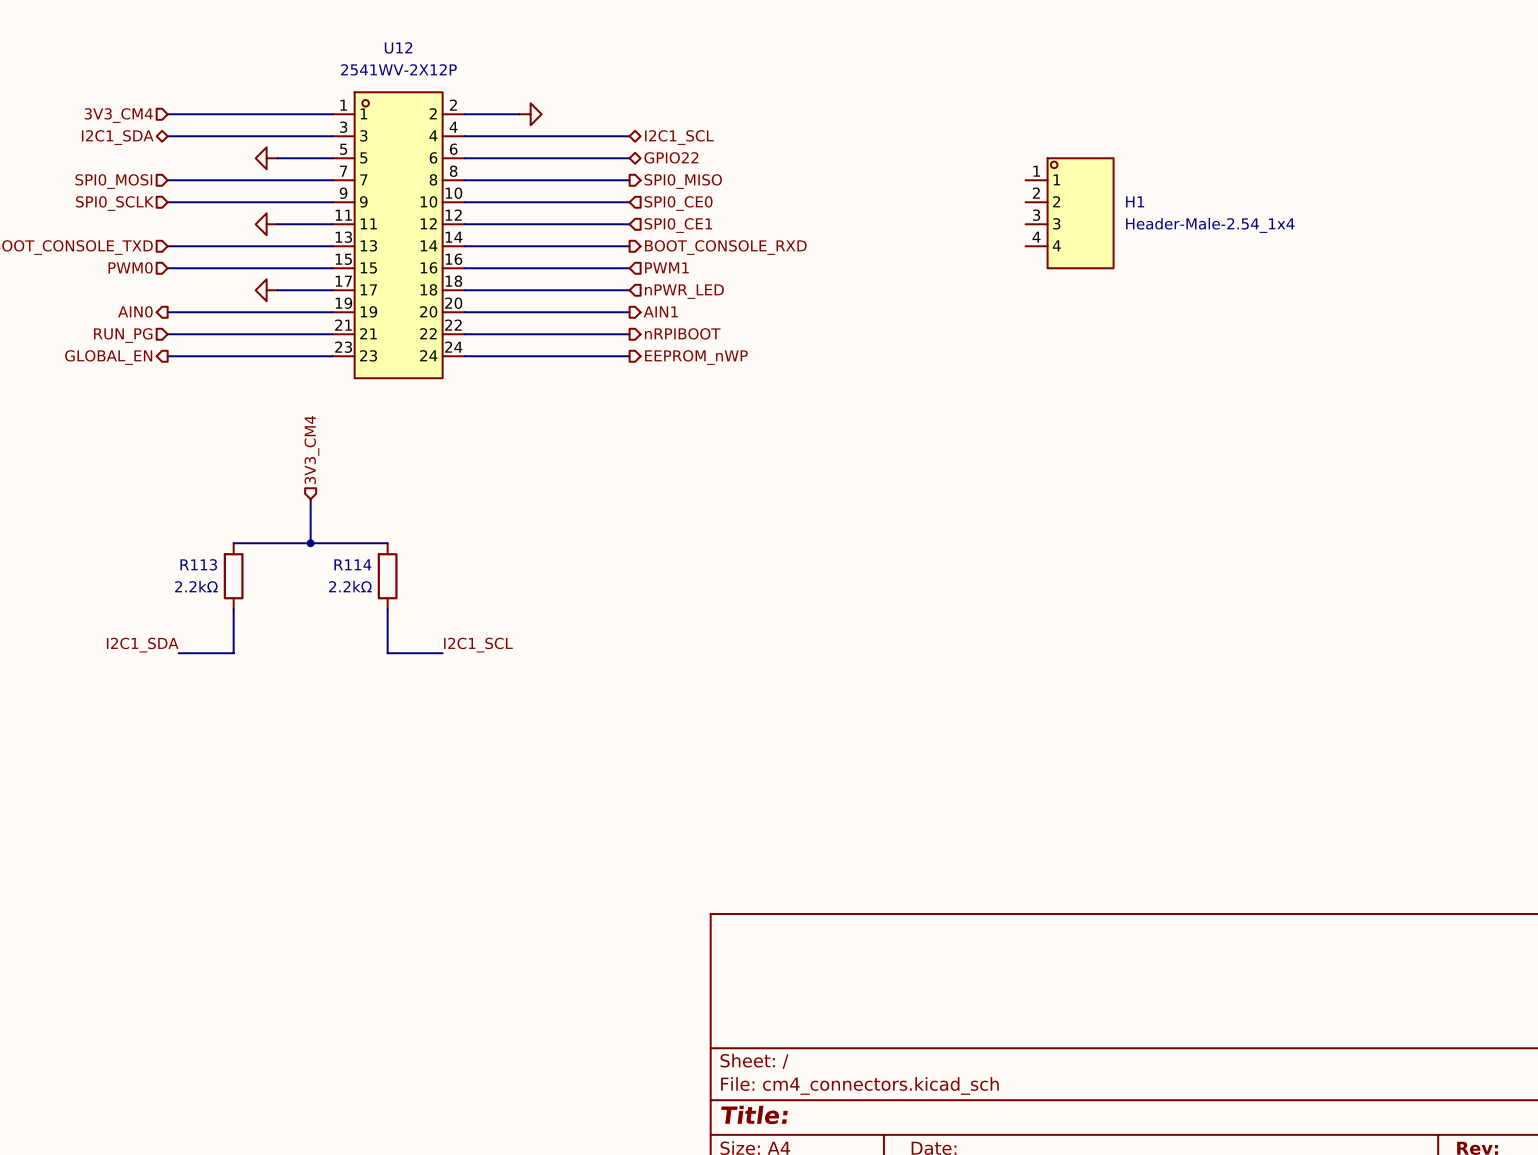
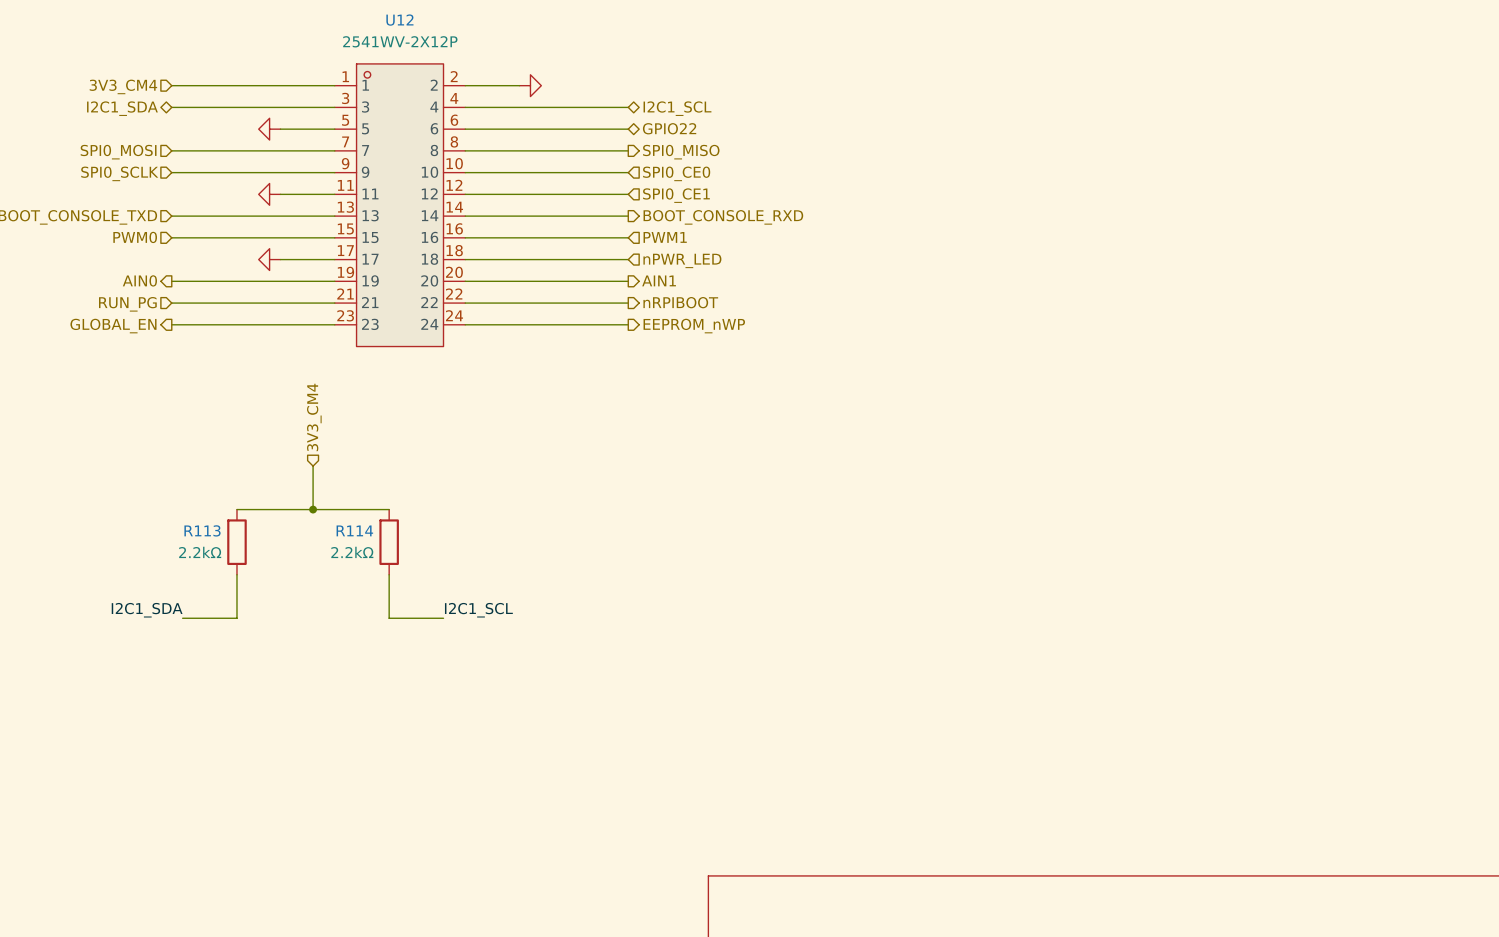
H1: Header-Male-2.54_1x4 (1069, 213) -> none

